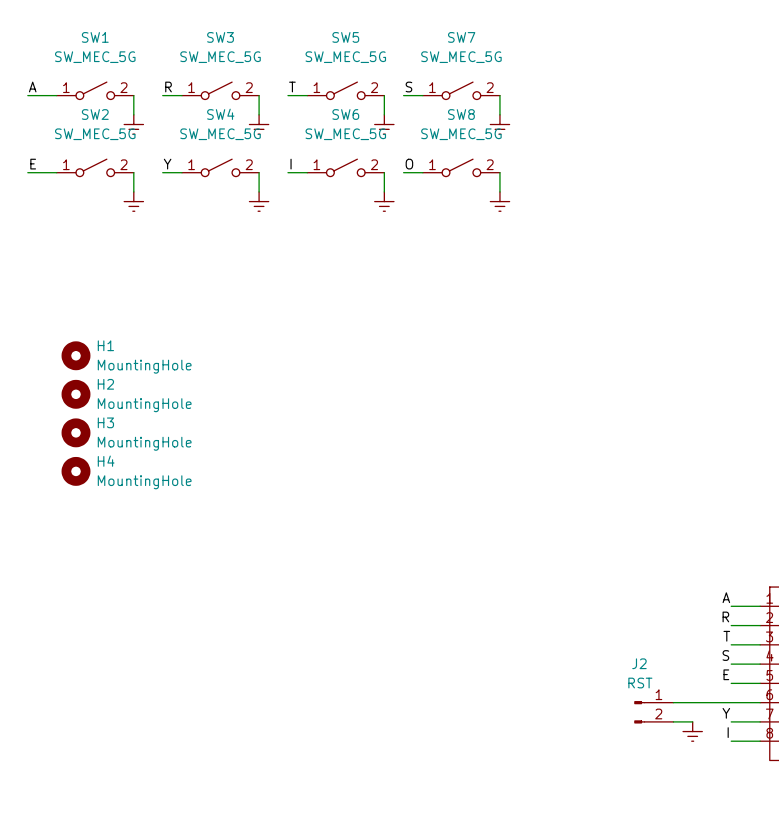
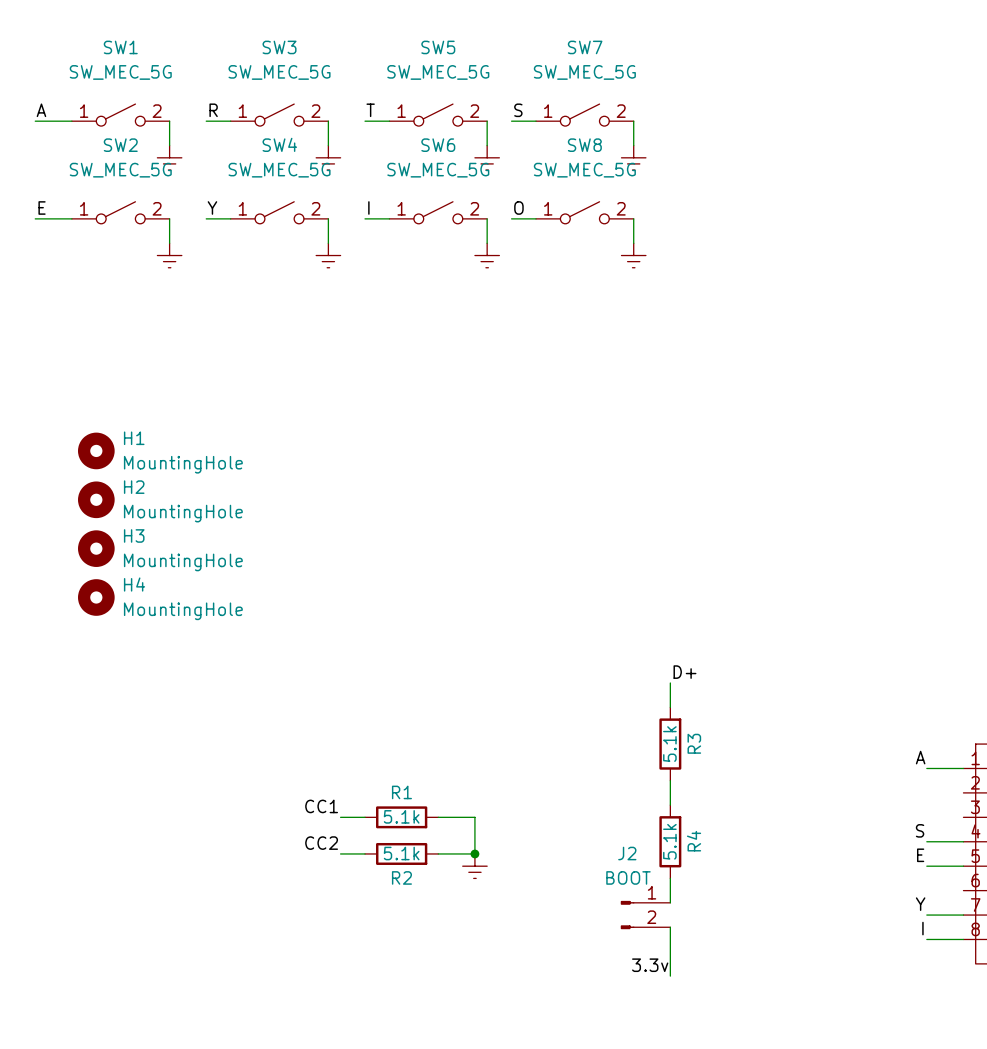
label: none -> D+ (684, 672)
wire: none -> (670, 682) (670, 707)
R3: none -> 5.1k (670, 744)
wire: none -> (670, 780) (670, 805)
label: R (725, 616) -> none
wire: (731, 625) (760, 625) -> none
label: none -> CC1 (321, 806)
label: T (726, 636) -> none
wire: none -> (340, 817) (365, 817)
R1: none -> 5.1k (401, 817)
wire: none -> (438, 817) (474, 817) (474, 853) (438, 853)
wire: (731, 644) (760, 644) -> none
R4: none -> 5.1k (670, 841)
label: none -> CC2 (321, 843)
wire: none -> (340, 853) (365, 853)
R2: none -> 5.1k (401, 853)
junction: none -> (474, 853)
power symbol: none -> (474, 866)
J2 value: RST (640, 683) -> BOOT (628, 877)
wire: none -> (670, 878) (670, 902)
wire: (673, 702) (760, 702) -> none
J2 position: (653, 712) -> (645, 915)
wire: (673, 721) (692, 721) -> none
wire: none -> (670, 927) (670, 976)
power symbol: (692, 731) -> none
label: none -> 3.3v (650, 965)

